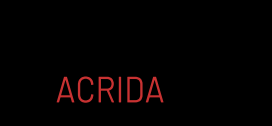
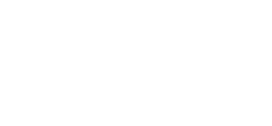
part: (110, 89) -> none

